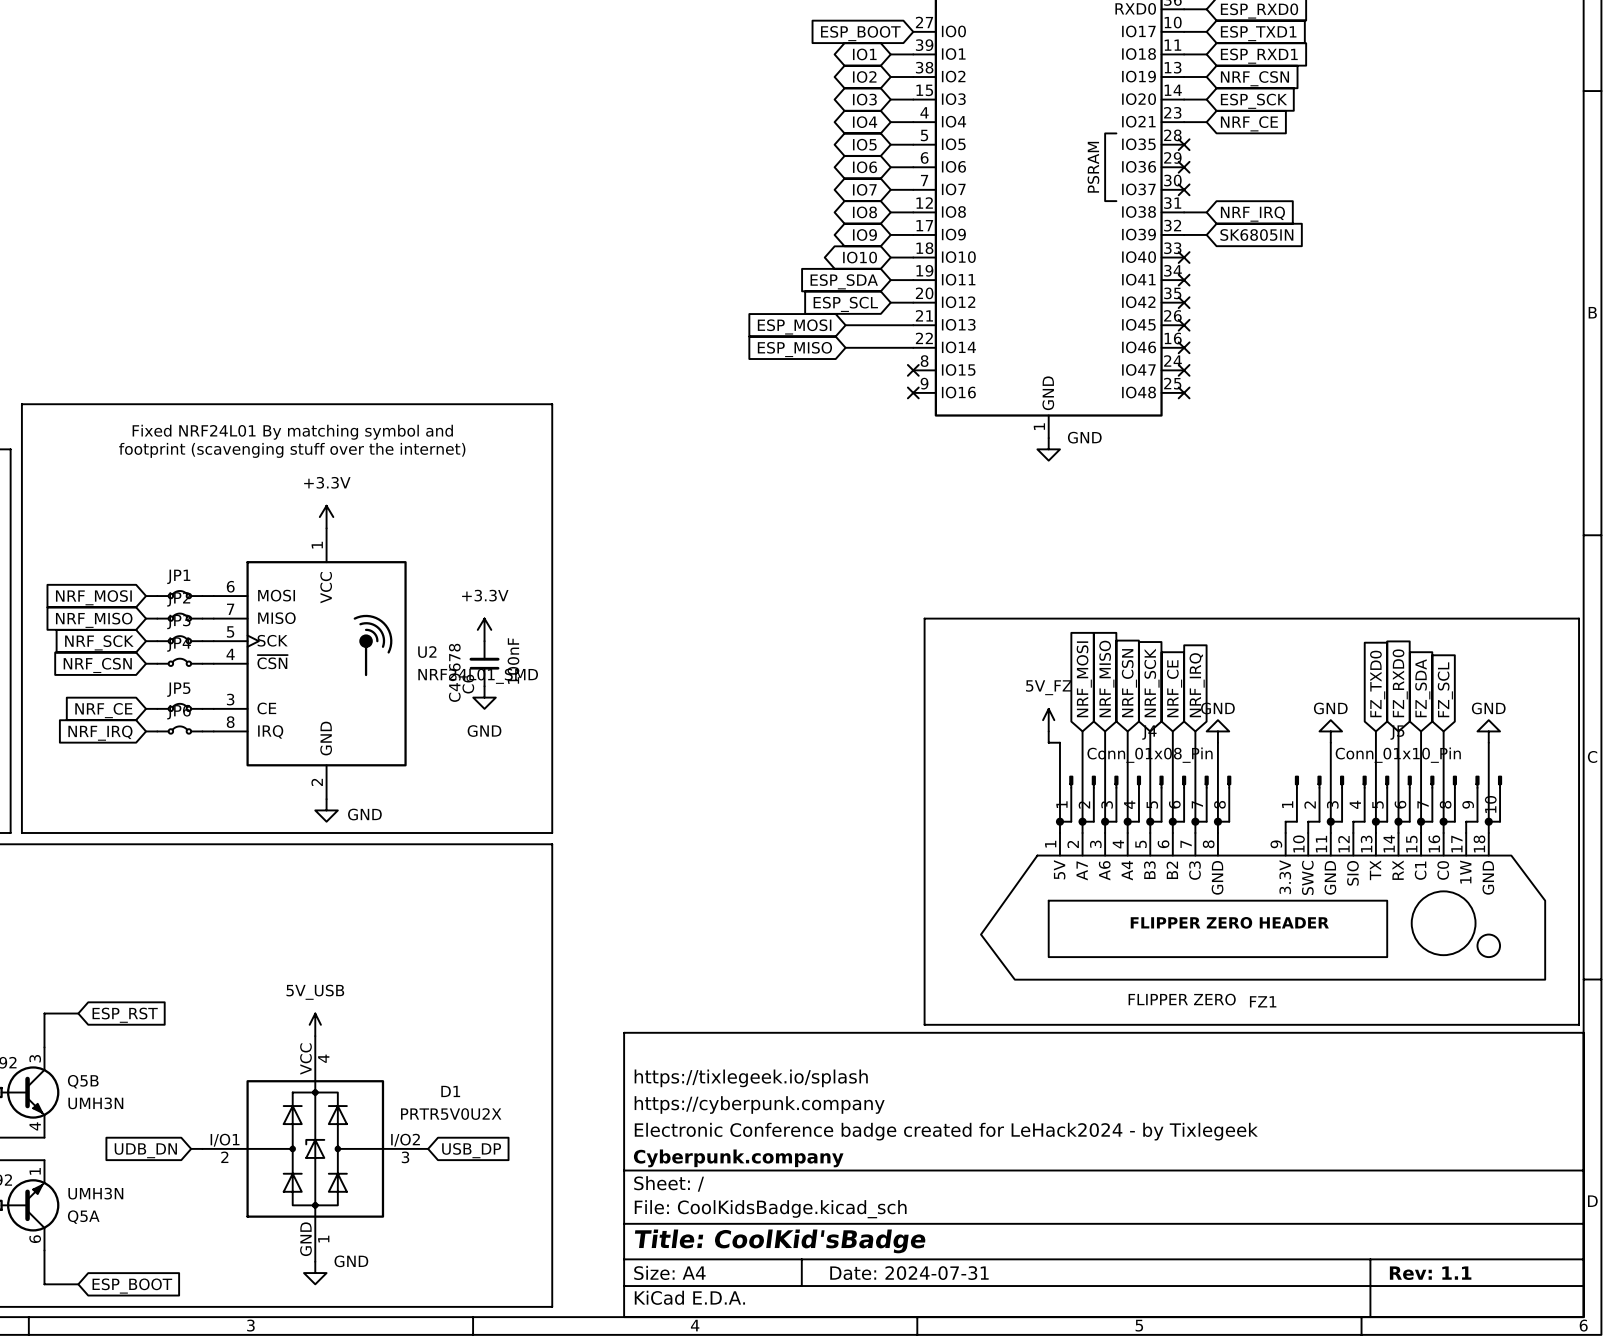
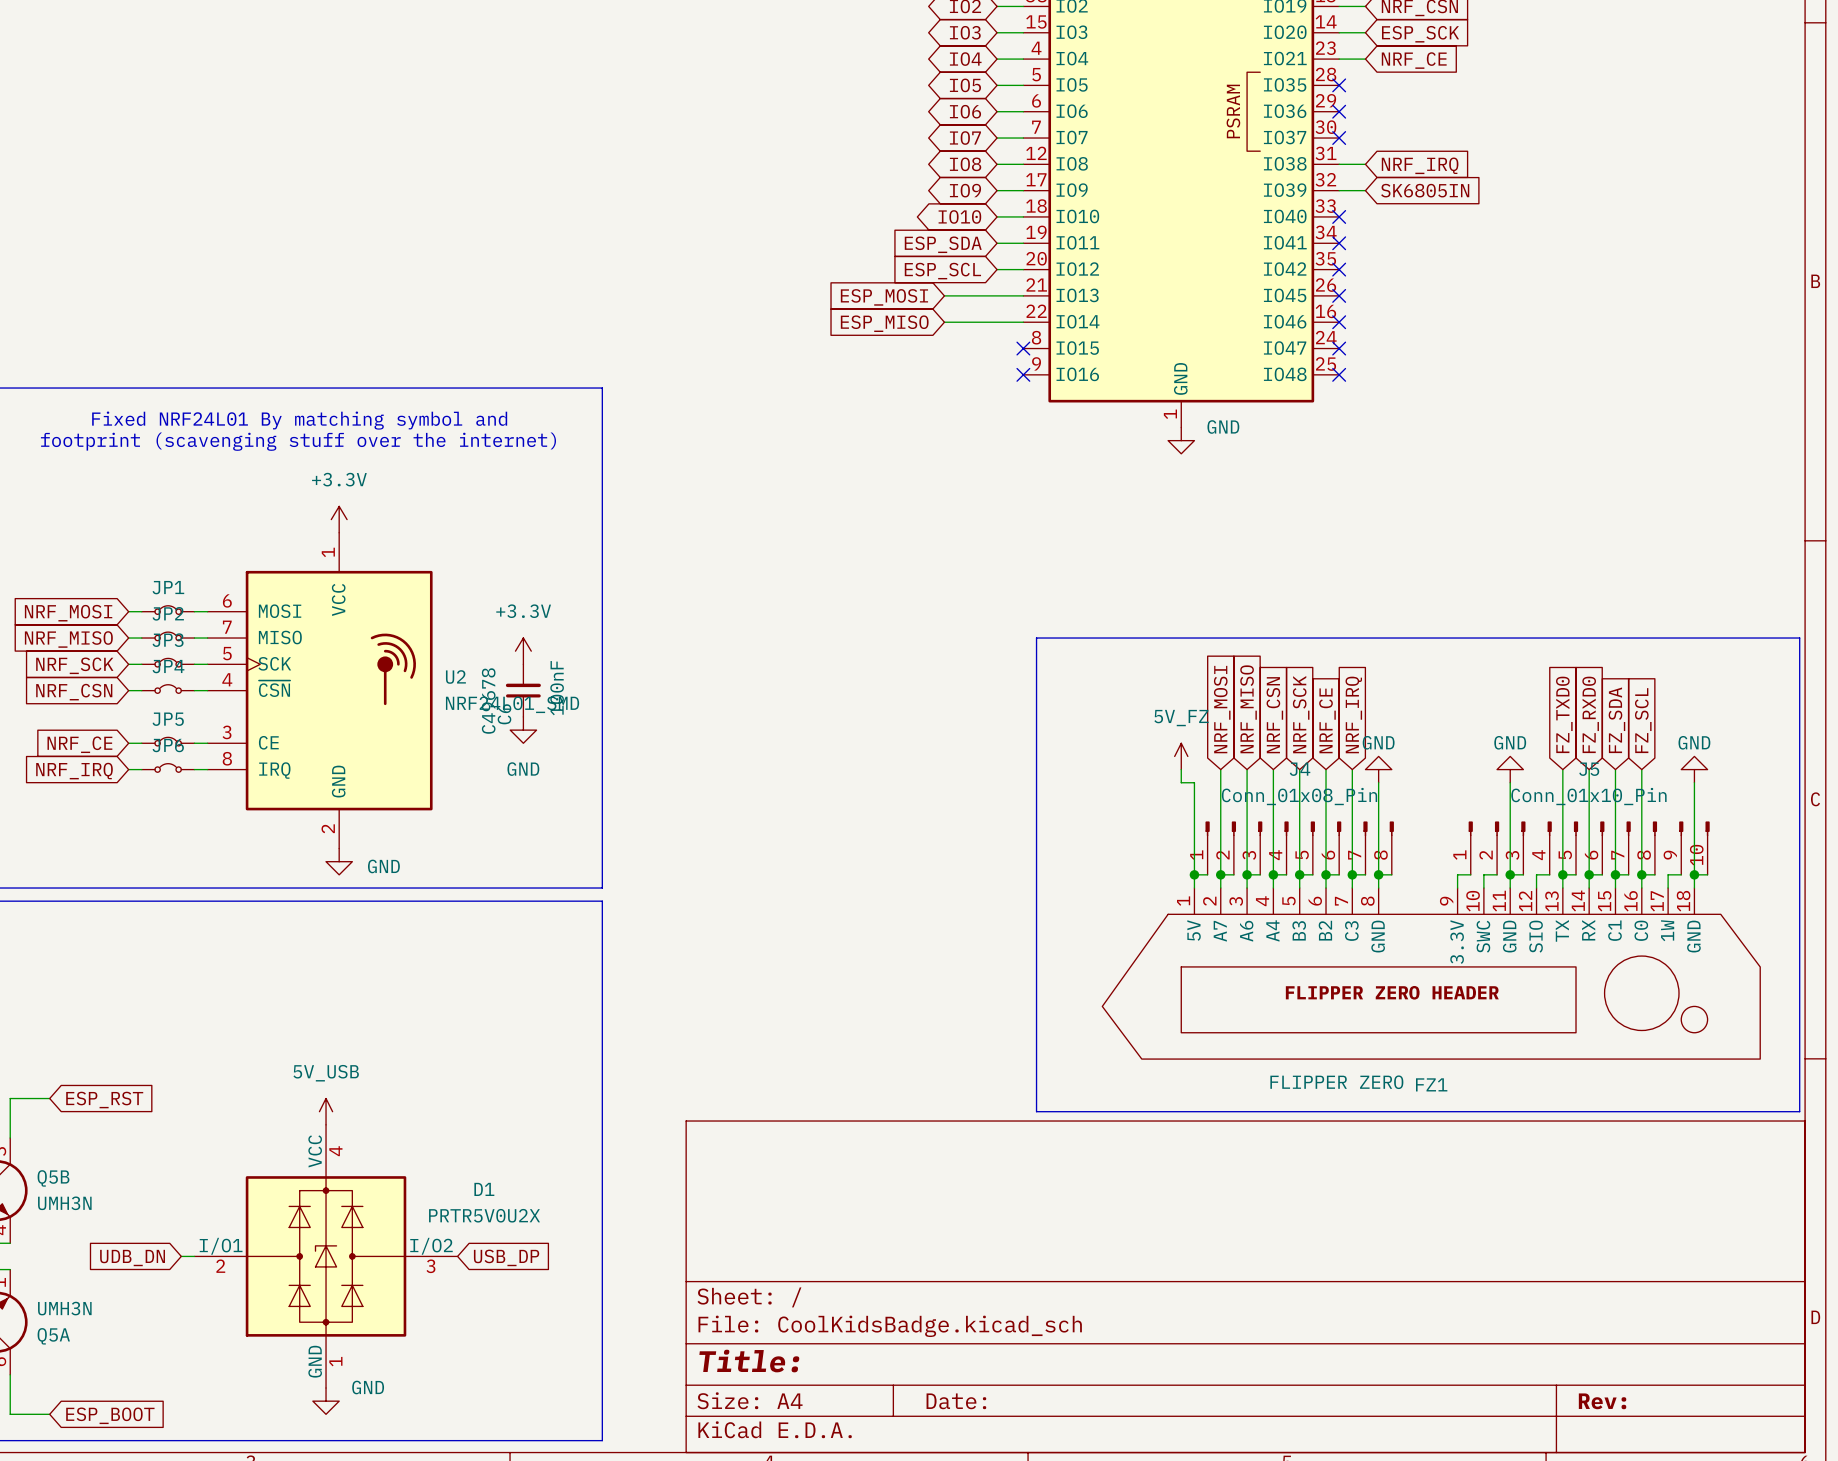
title block: https://tixlegeek.io/splash (751, 1078) -> none
title block: https://cyberpunk.company (759, 1105) -> none
title block: Electronic Conference badge created for LeHack2024 - by Tixlegeek (946, 1131) -> none
title block: Cyberpunk.company (738, 1158) -> none
title block: Title: CoolKid'sBadge (780, 1241) -> Title: (749, 1361)
title block: Date: 2024-07-31 (909, 1273) -> Date: (956, 1401)
title block: Rev: 1.1 (1430, 1273) -> Rev: (1602, 1401)

